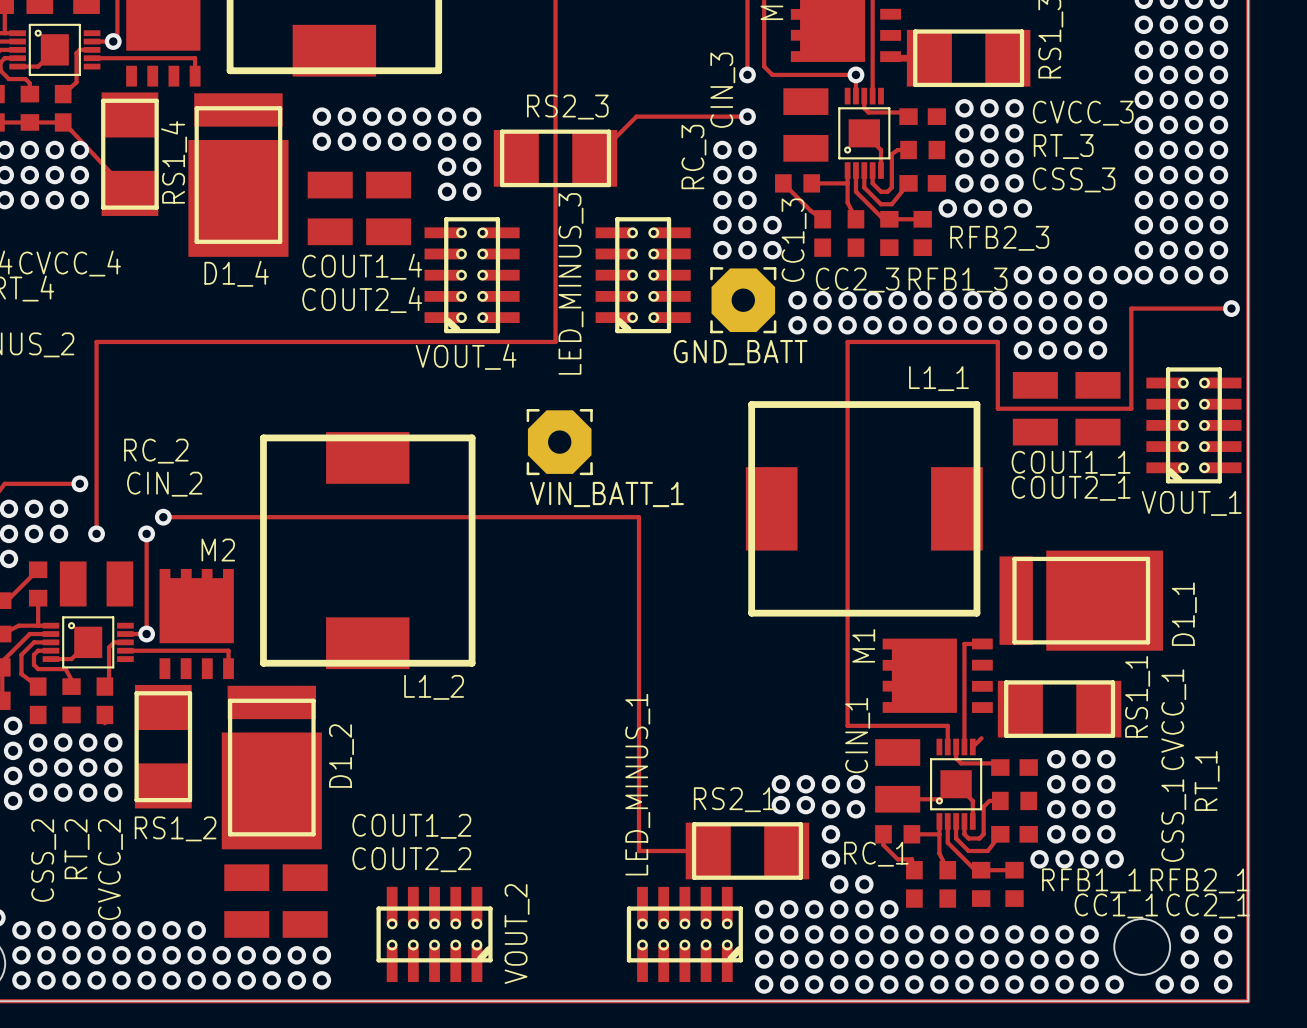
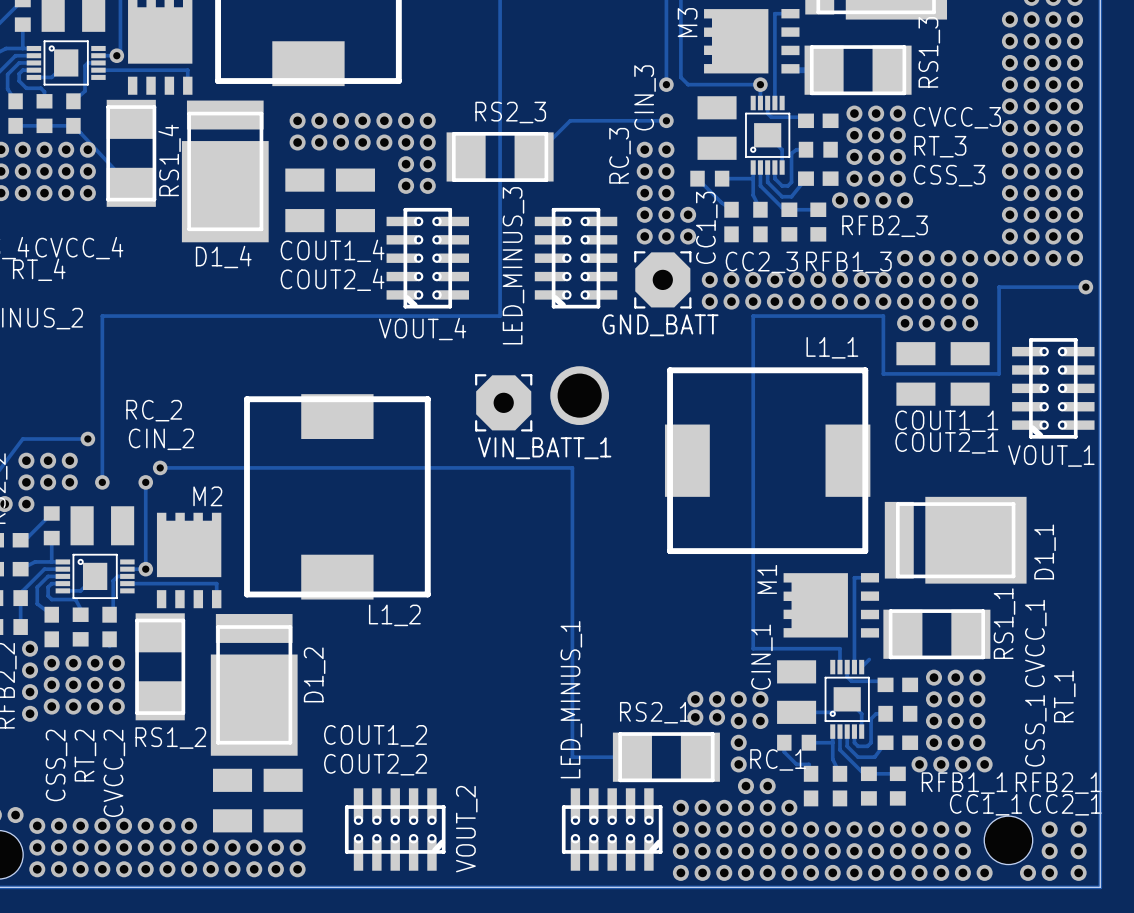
part: none -> (579, 395)

